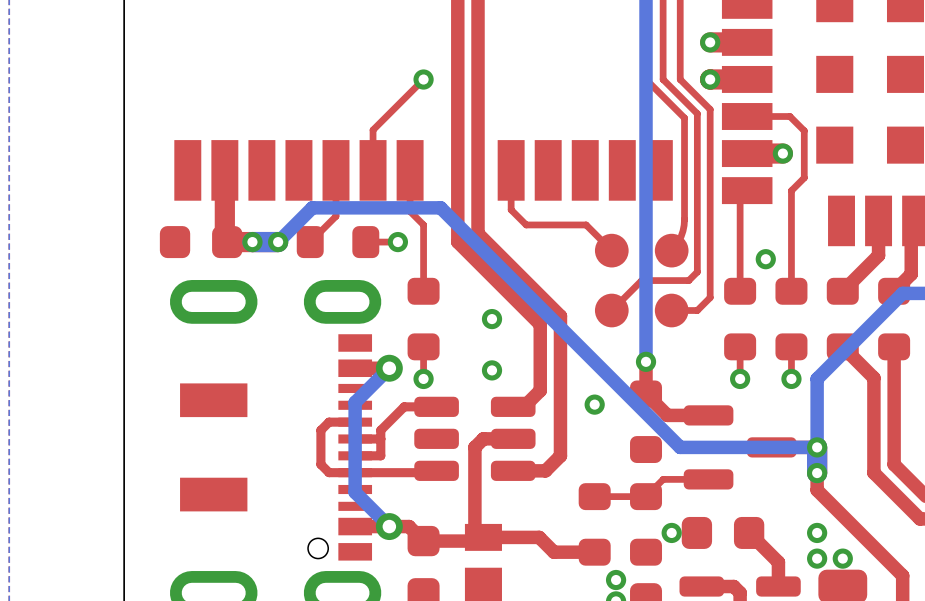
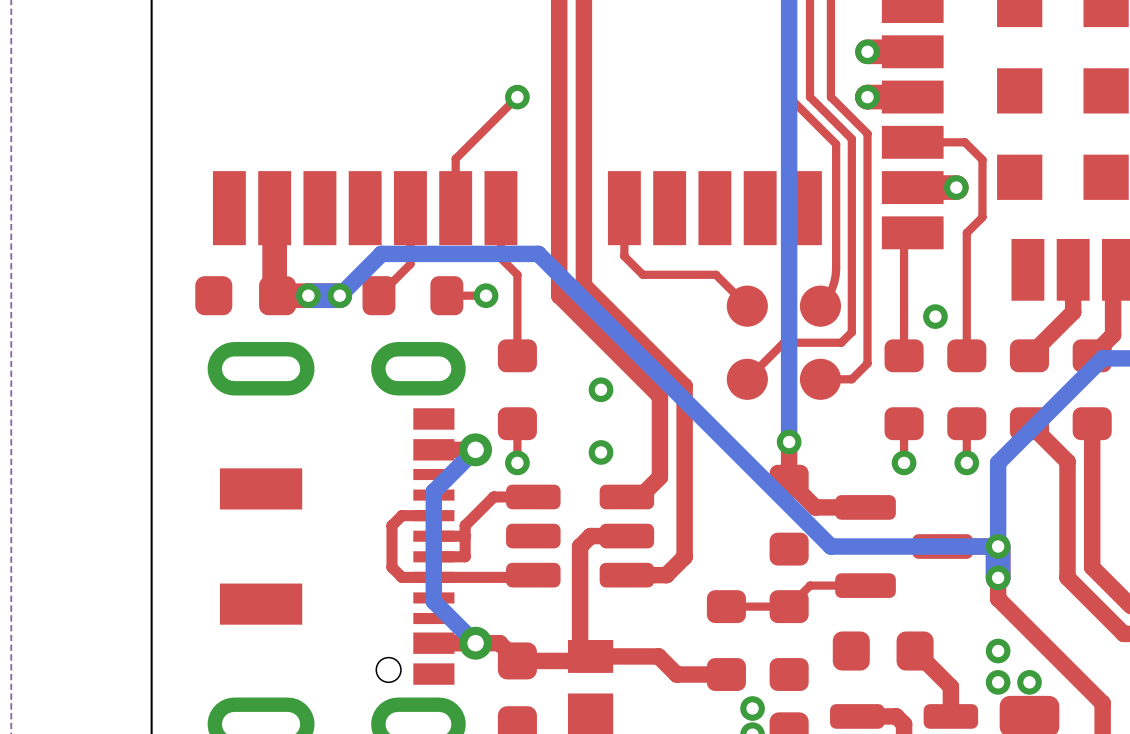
via: (594, 404) -> none
via: (671, 532) -> none

